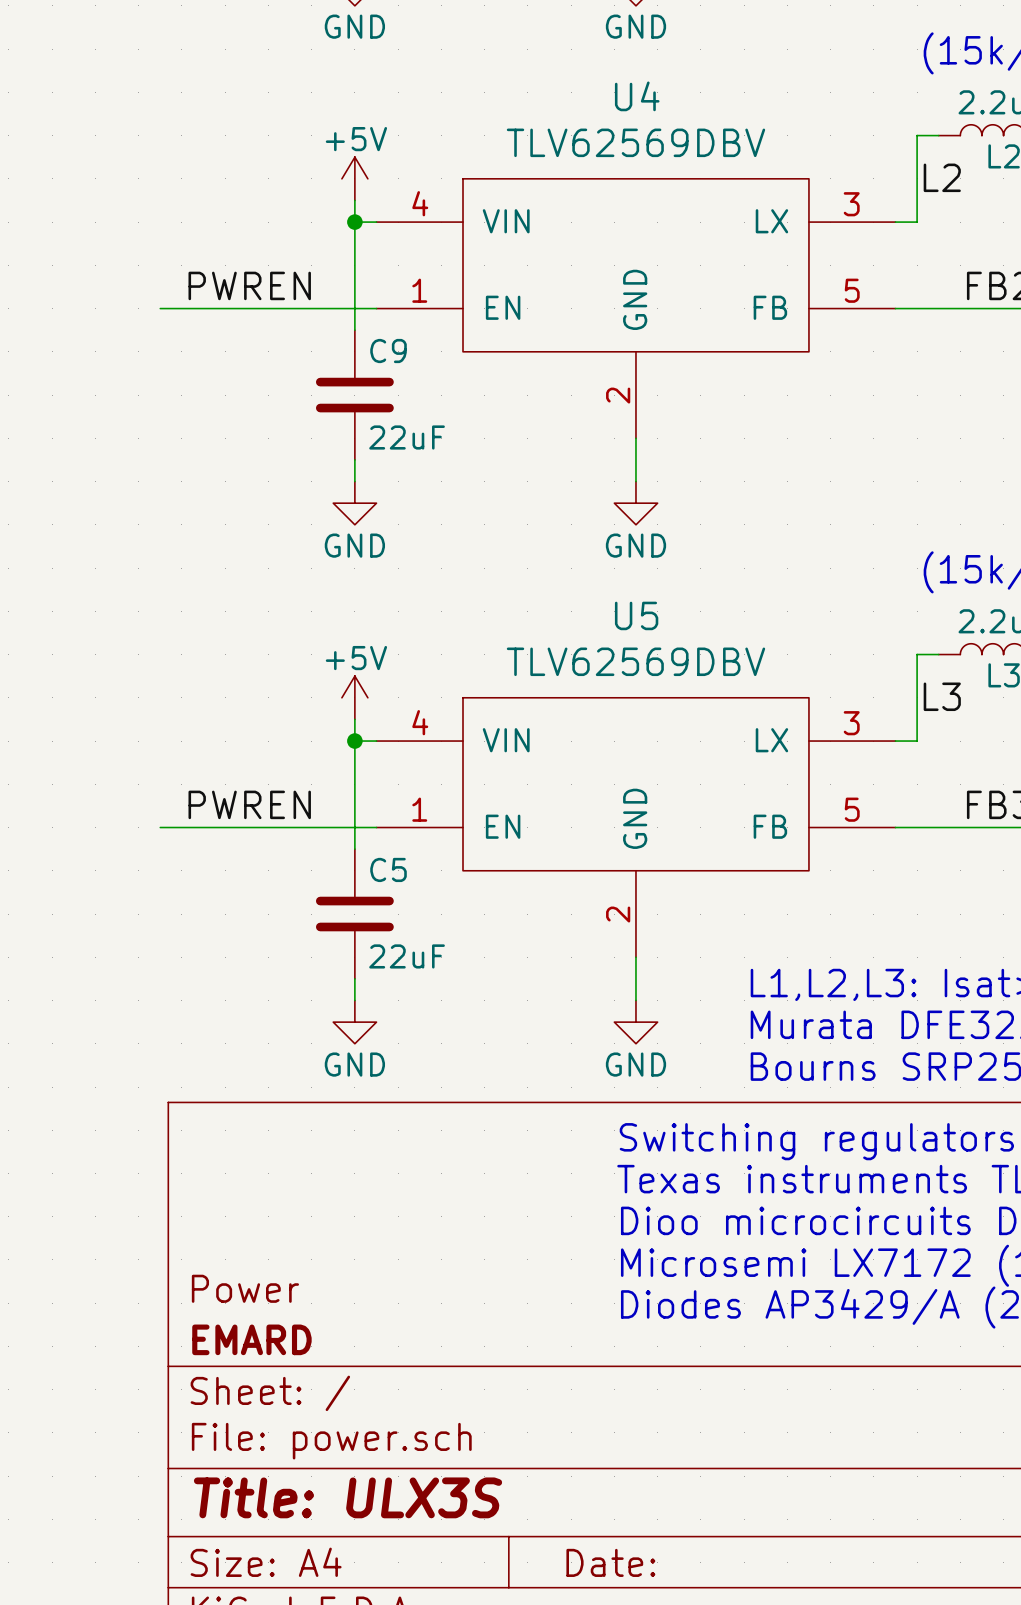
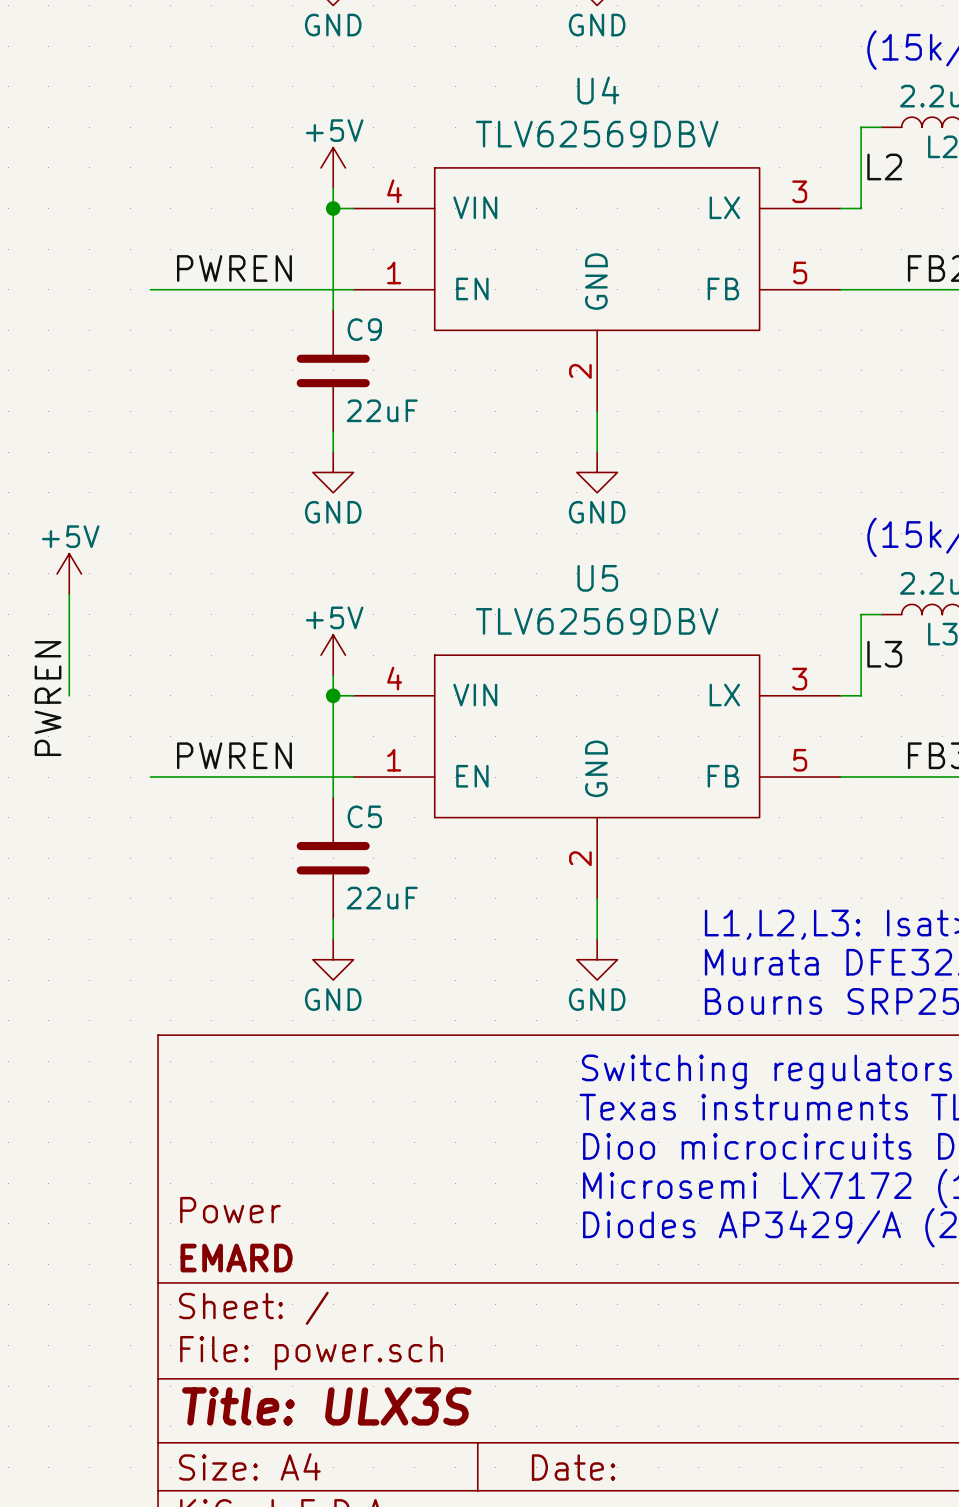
power symbol: none -> +5V (69, 573)
wire: none -> (69, 594) (69, 695)
label: none -> PWREN (48, 698)

